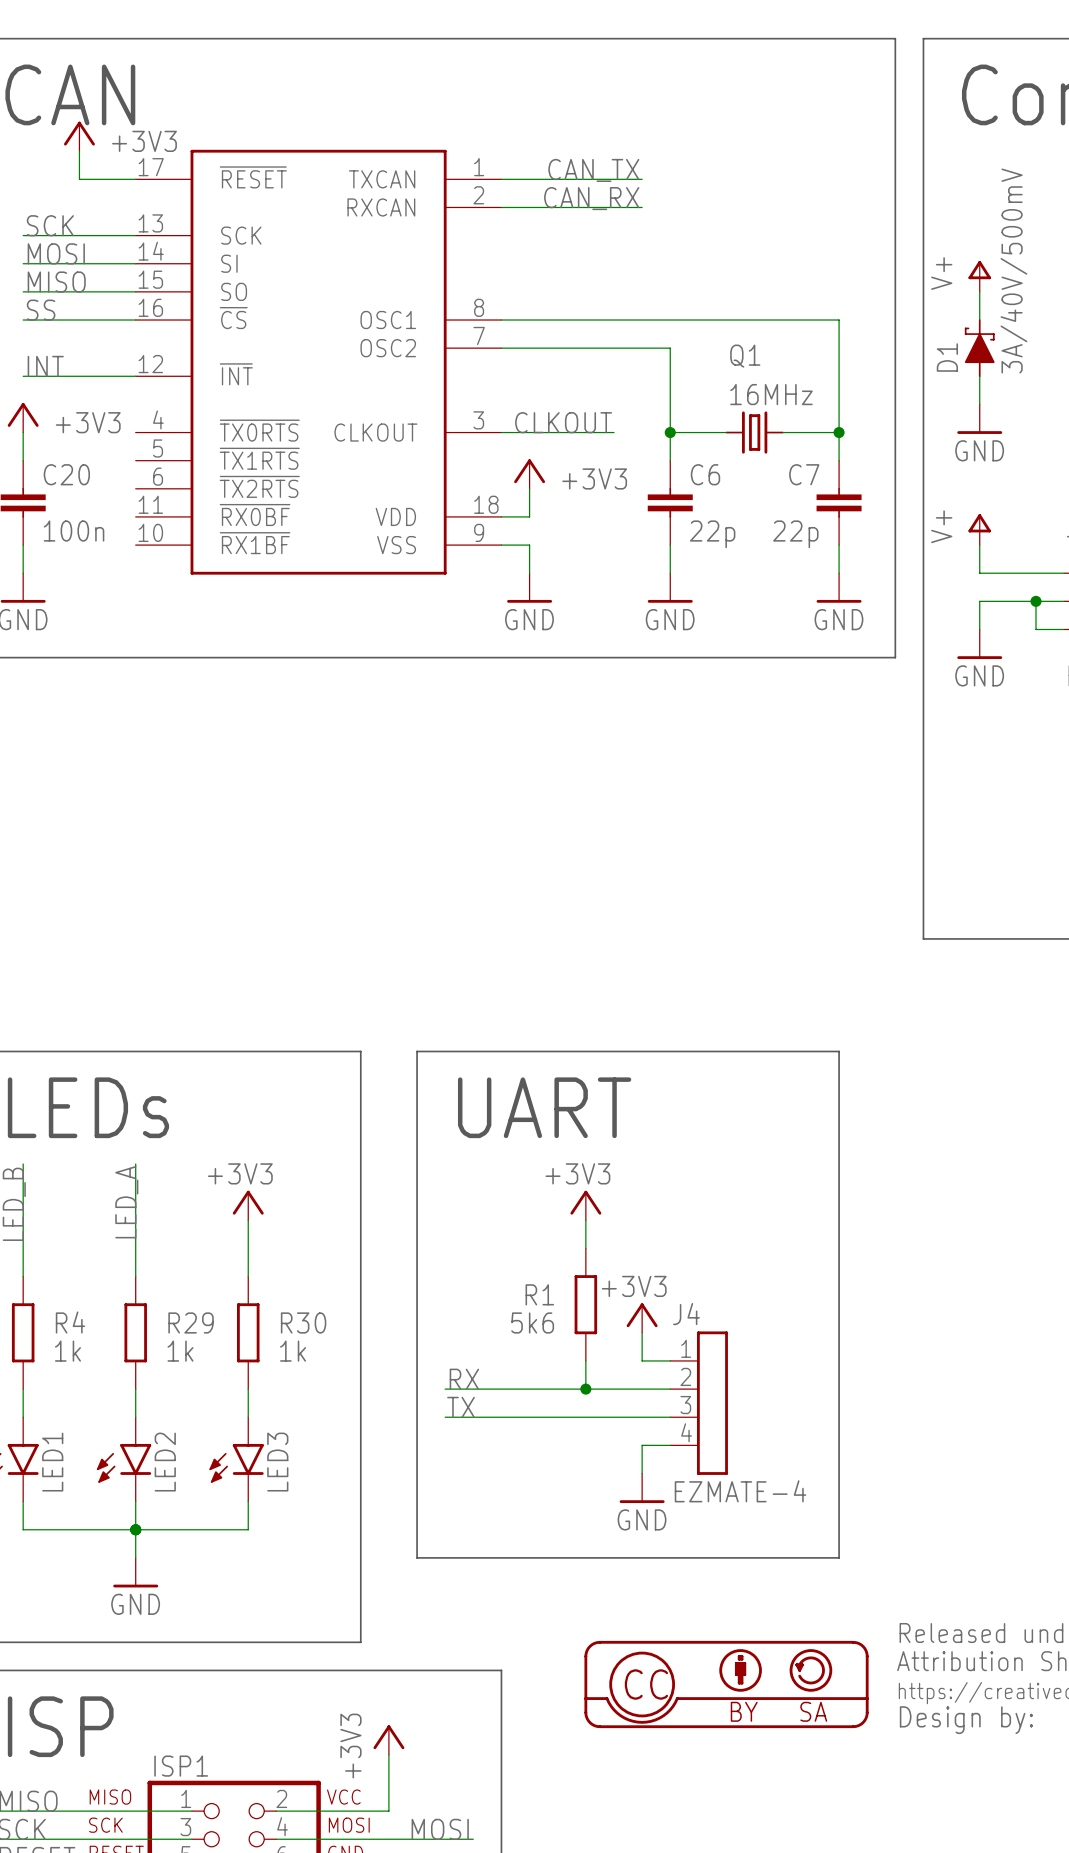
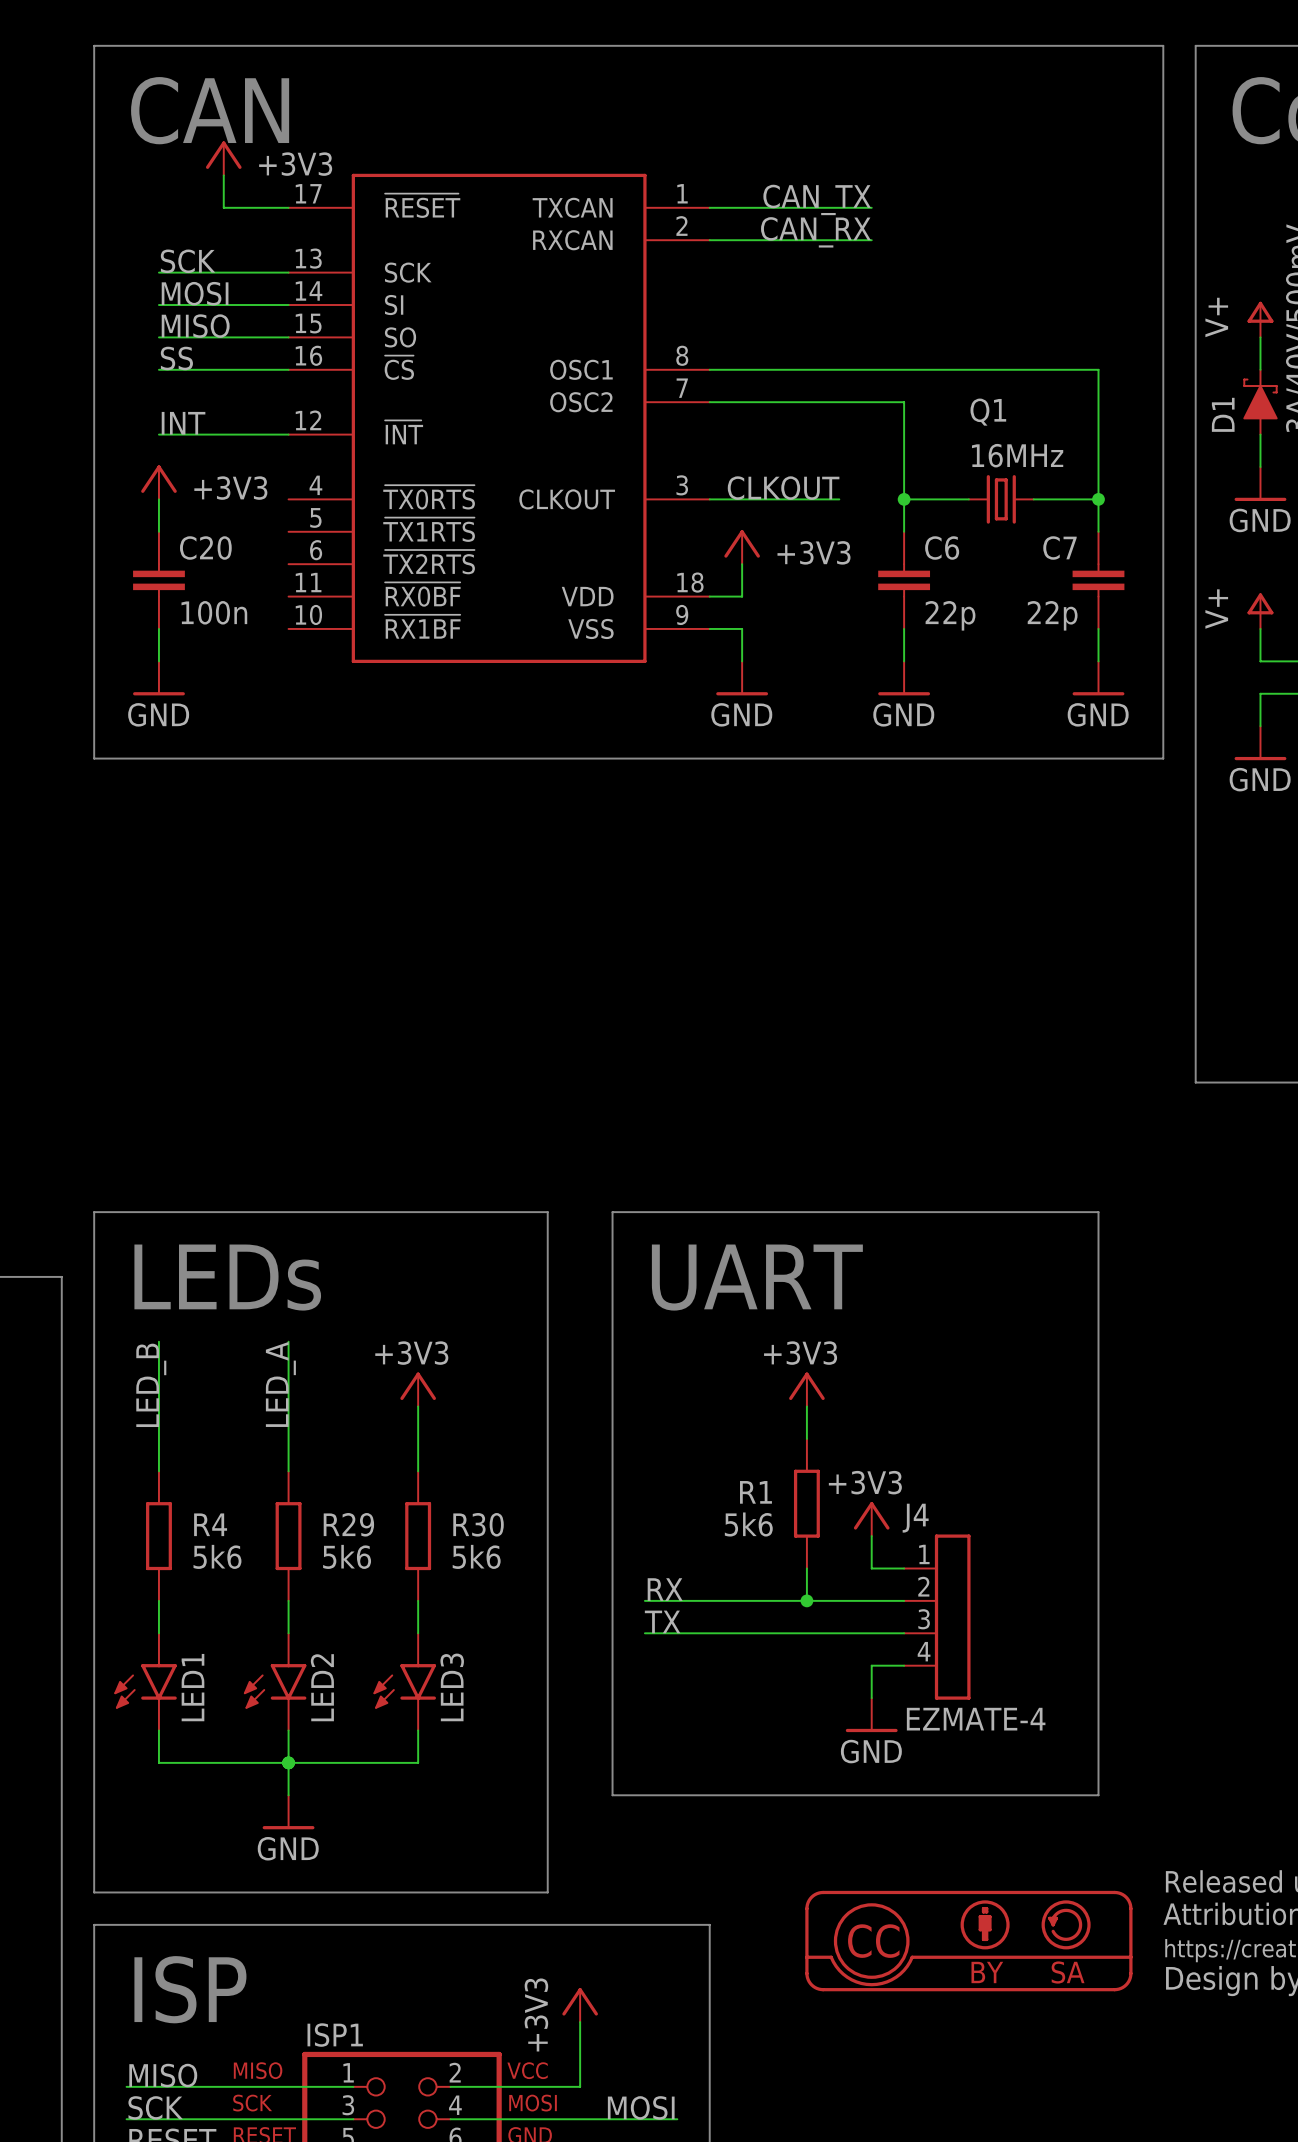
R4 value: 1k (67, 1351) -> 5k6 (217, 1556)
R29 value: 1k (180, 1351) -> 5k6 (347, 1556)
R30 value: 1k (293, 1351) -> 5k6 (476, 1556)

